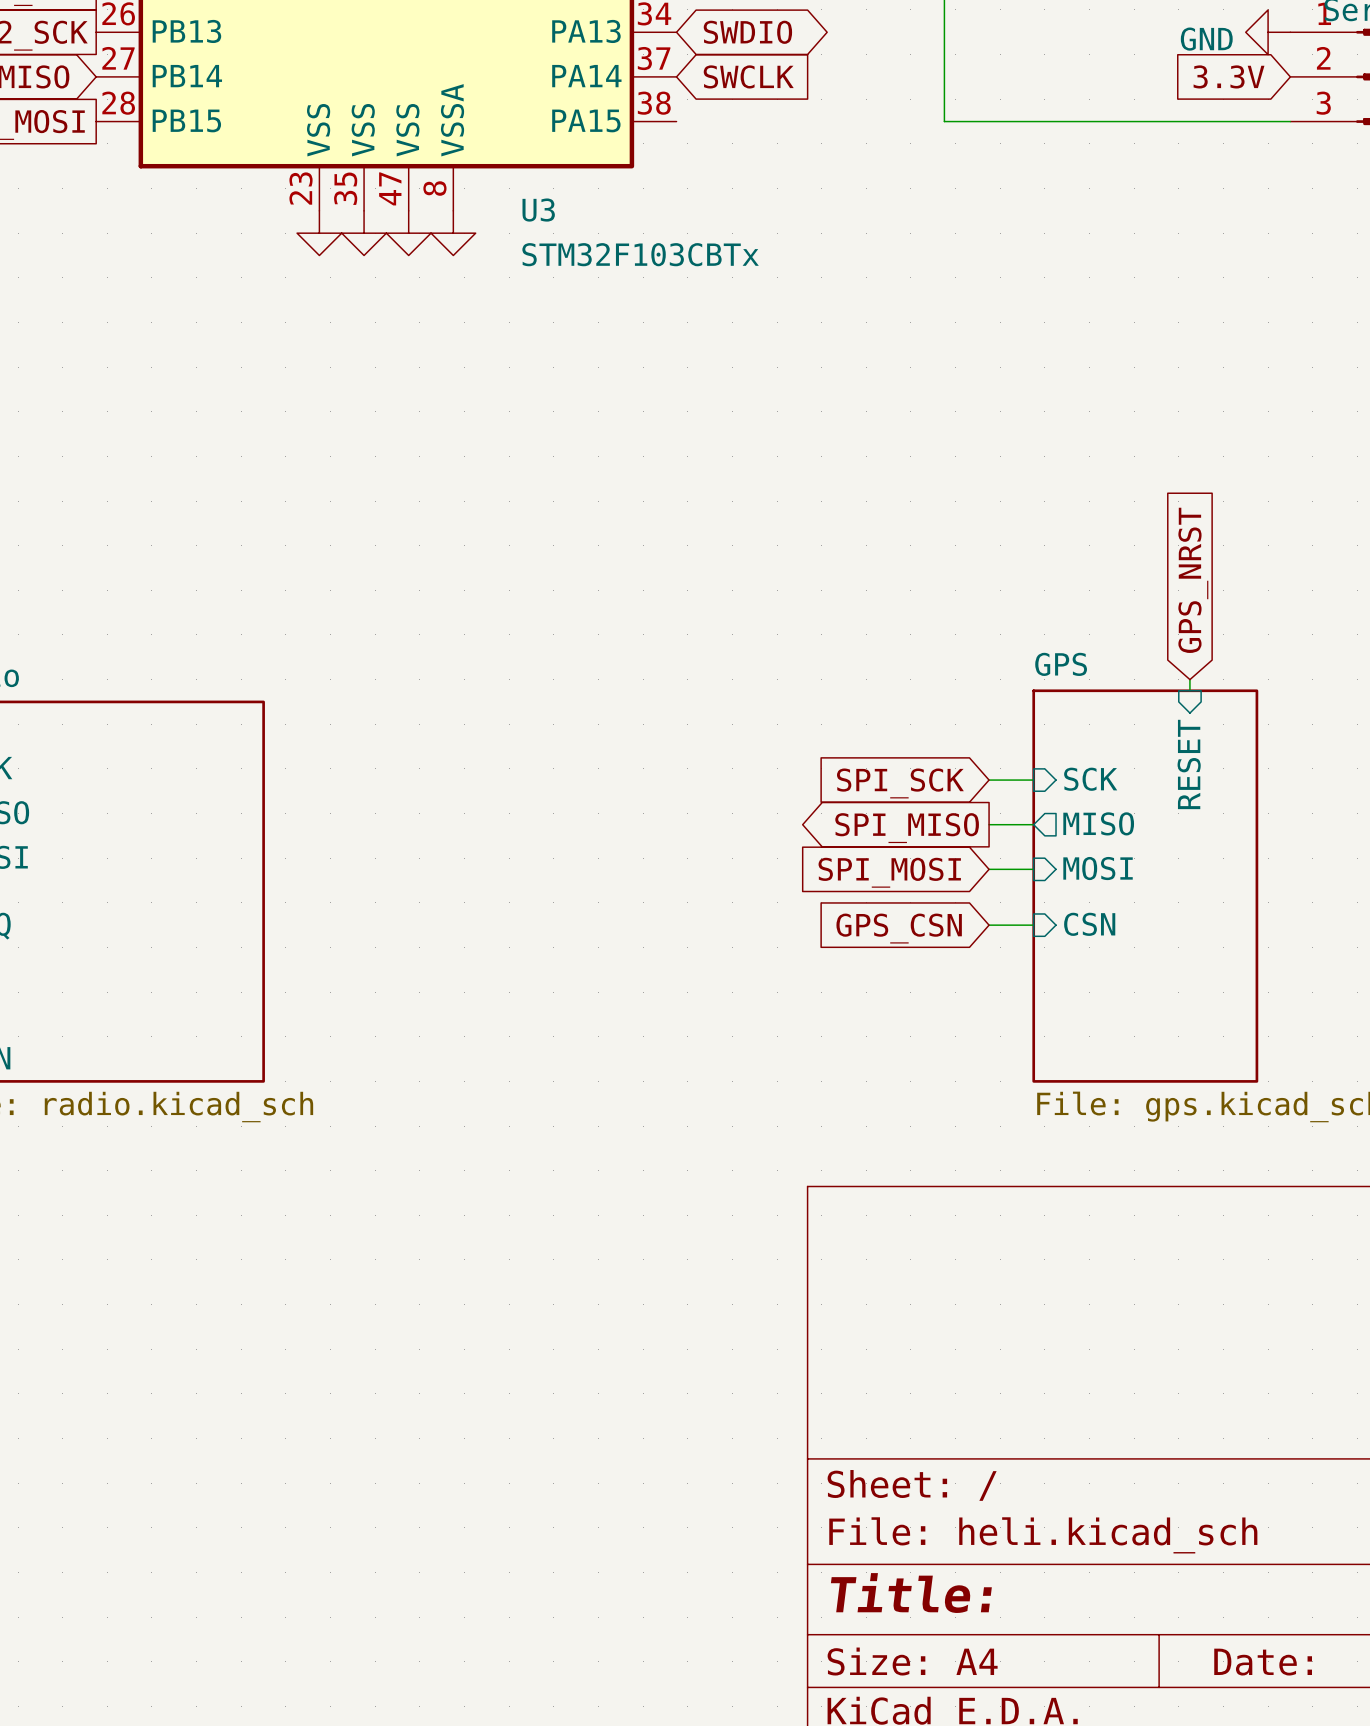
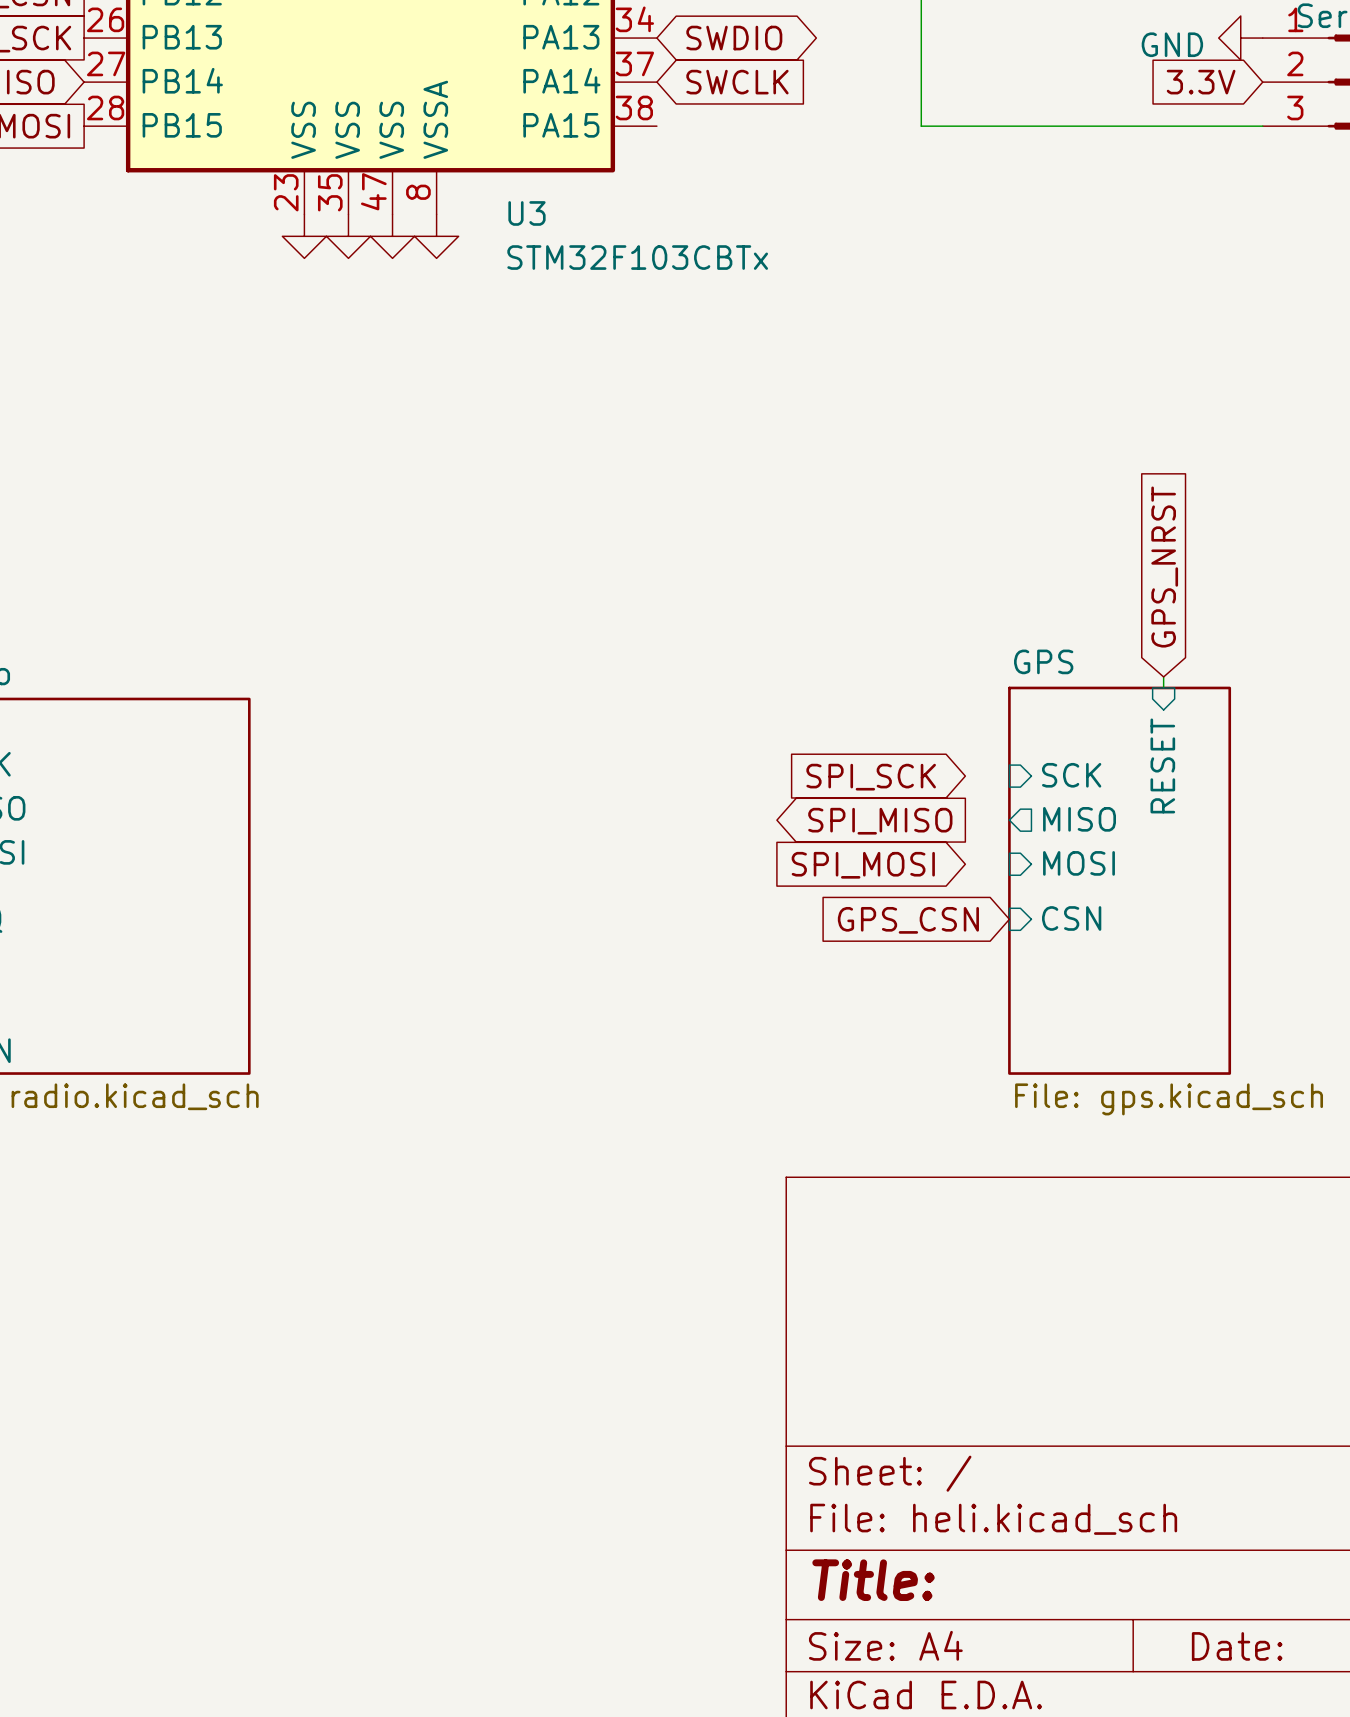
wire: (989, 780) (1033, 780) -> none
wire: (989, 824) (1033, 824) -> none
wire: (989, 869) (1033, 869) -> none
wire: (989, 925) (1033, 925) -> none
global label position: GPS_CSN (899, 928) -> GPS_CSN (908, 920)

